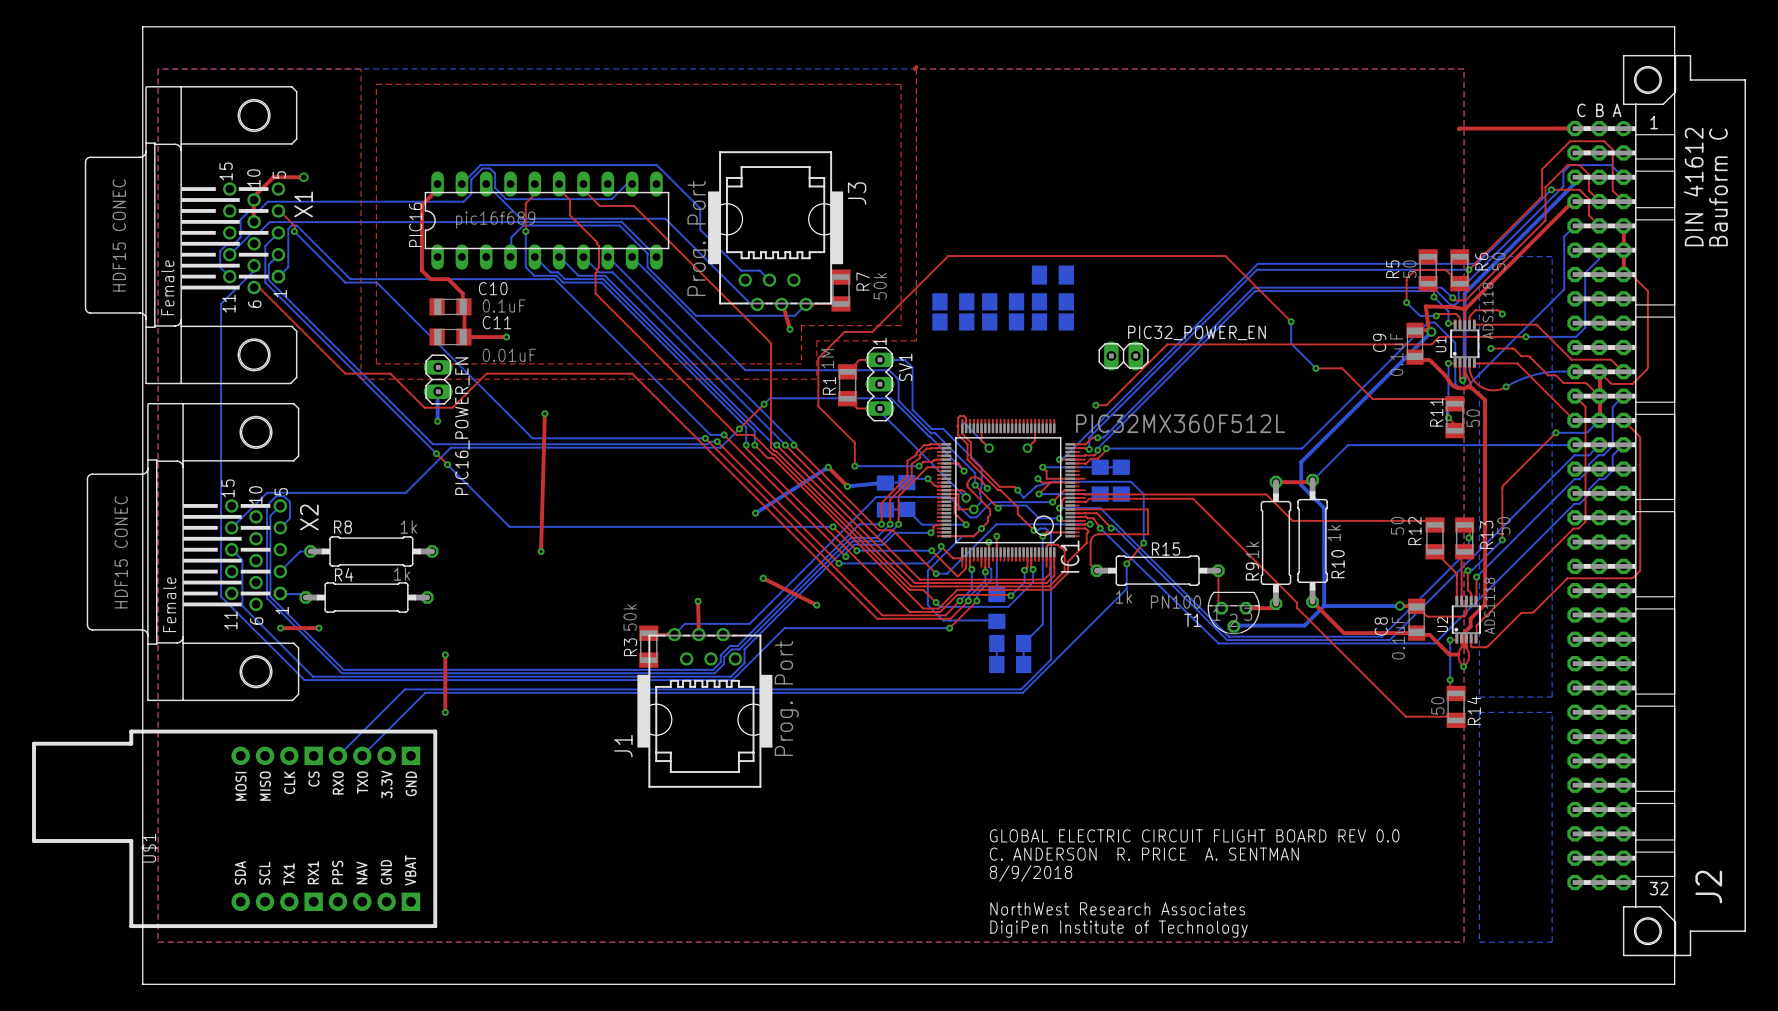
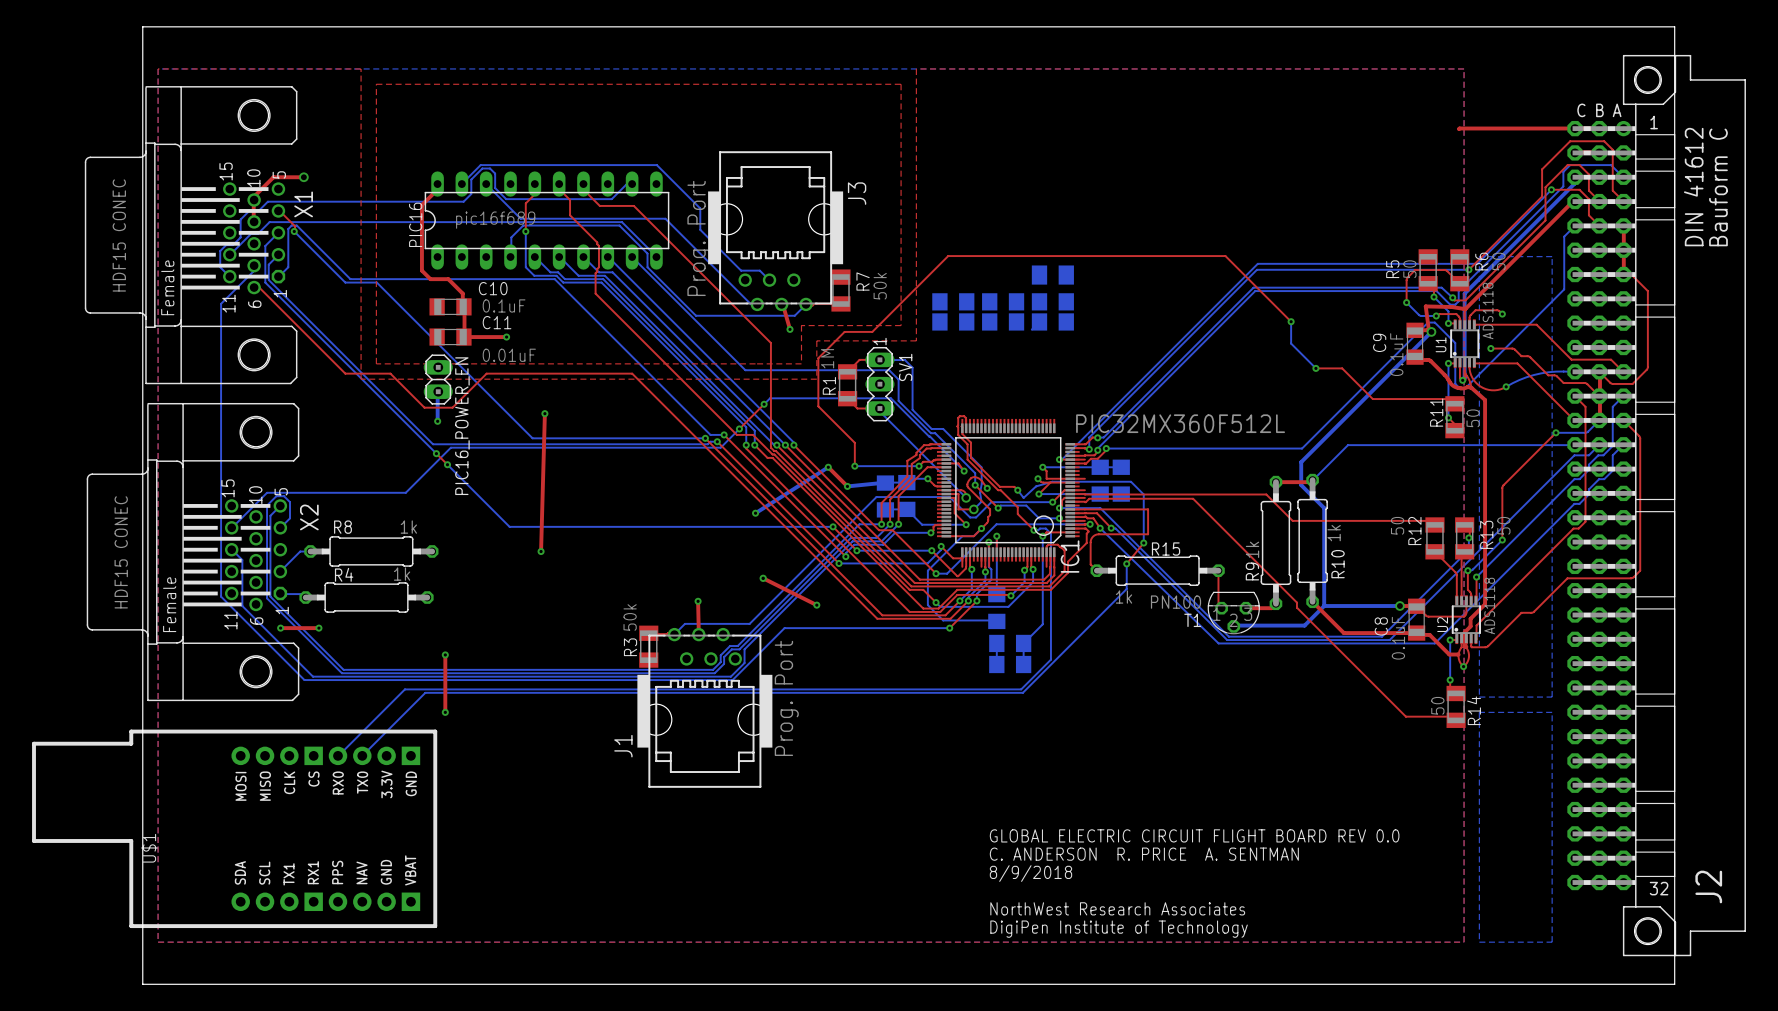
top track: (916, 67) (914, 68) -> none
bottom track: (1599, 250) (1598, 259) (1585, 273) (1585, 327) (1576, 336) (1525, 336) -> none
top track: (1525, 336) (1439, 336) (1431, 344) (1167, 344) (1106, 405) (1095, 405) -> none
via: (1525, 336) -> none
PIC32_POWER_EN: (1123, 355) -> none
via: (1095, 405) -> none
bottom track: (962, 421) (989, 448) -> none
top track: (981, 426) (981, 440) (989, 448) -> none
top track: (1035, 426) (1035, 440) (1027, 448) -> none
via: (989, 448) -> none
via: (1027, 448) -> none

